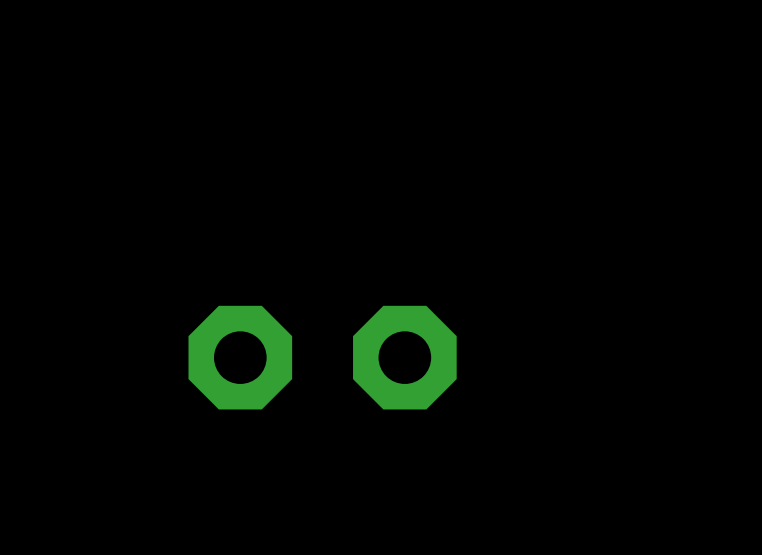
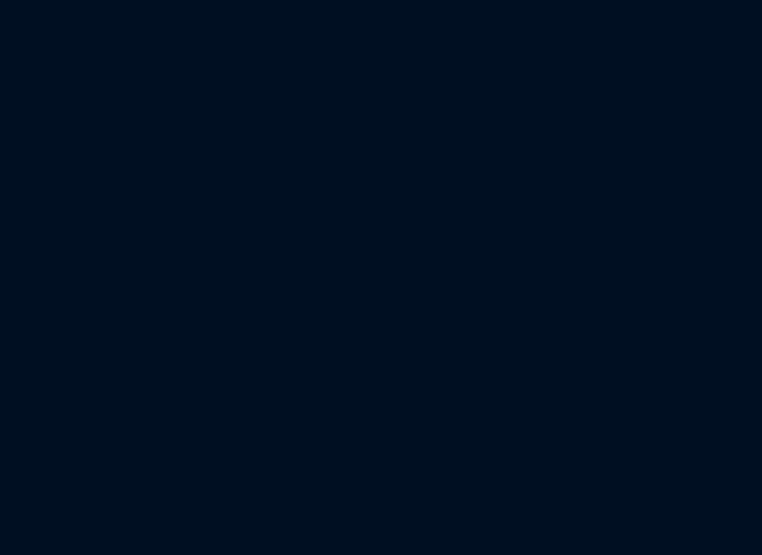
part: (322, 357) -> none

